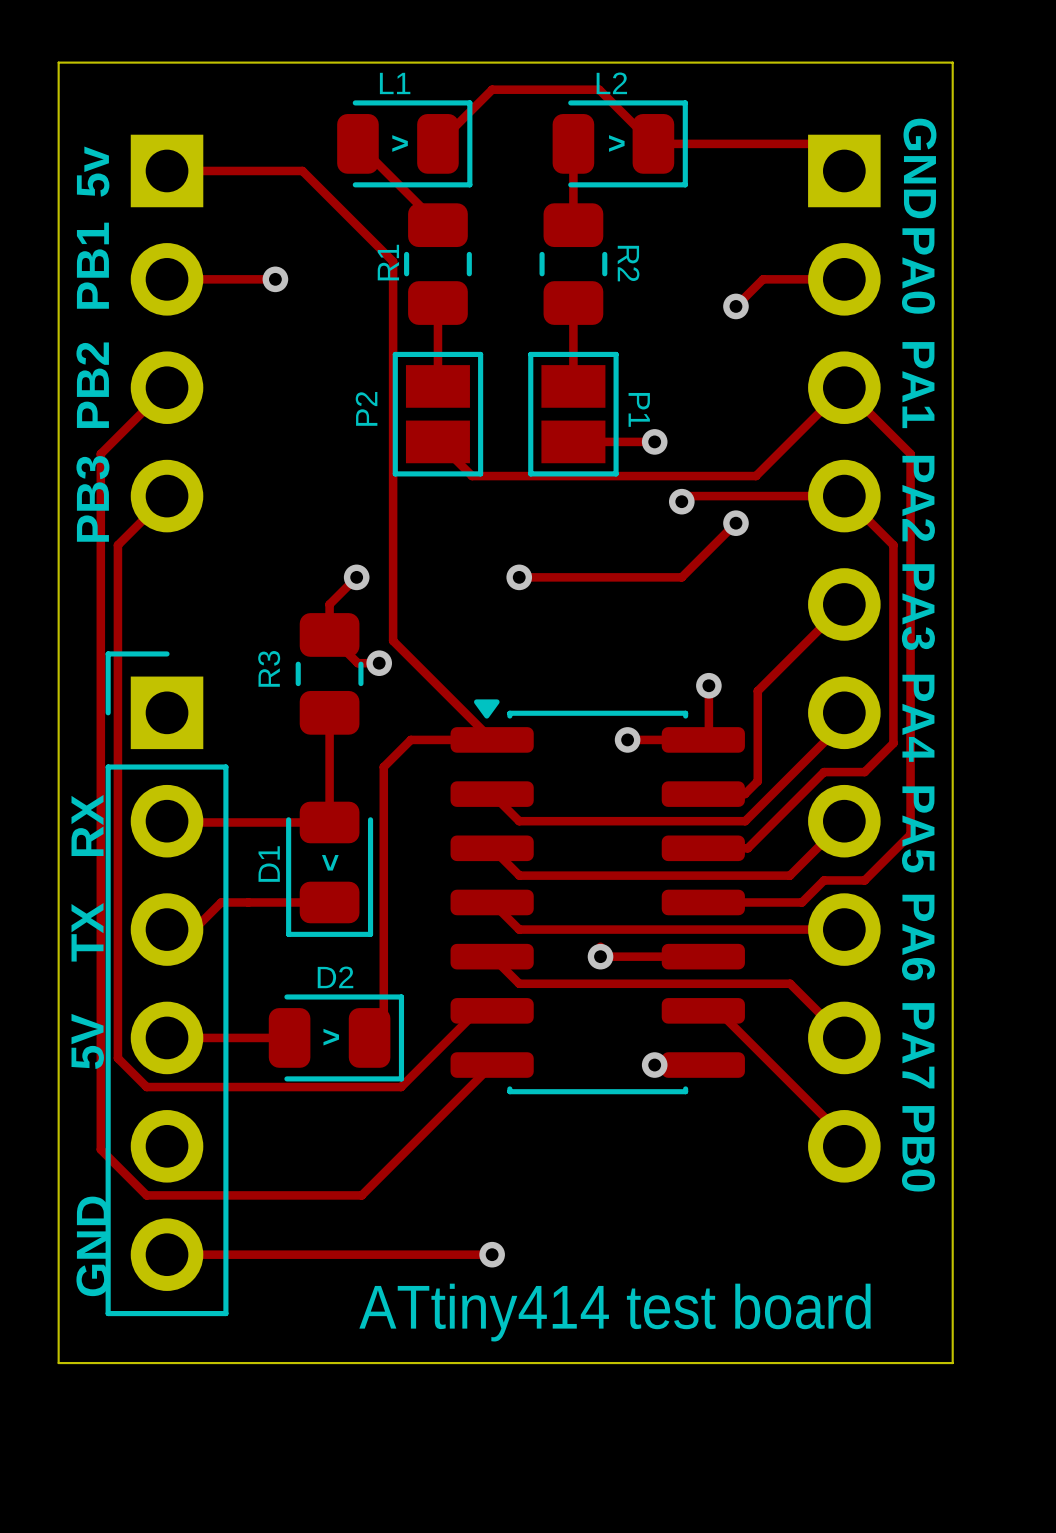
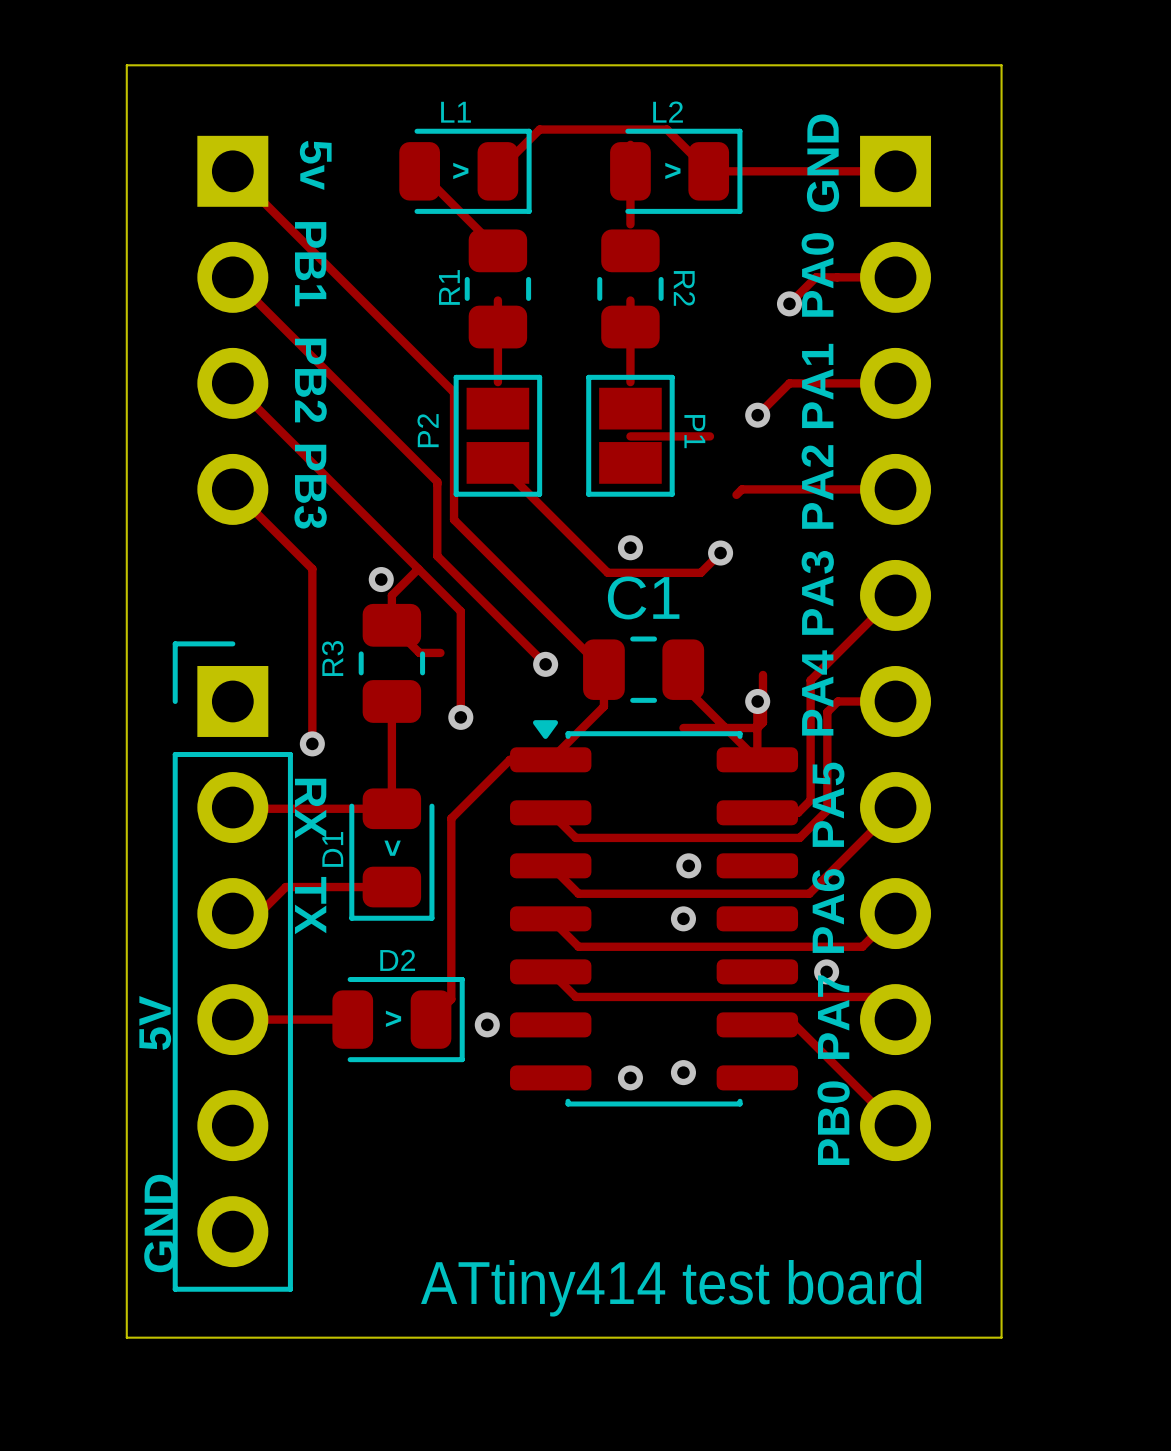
text position: L1 (395, 83) -> L1 (456, 112)
text position: L2 (611, 83) -> L2 (668, 112)
track: (357, 143) (437, 225) -> (419, 171) (497, 250)
text position: > (400, 143) -> > (460, 170)
part position: (404, 143) -> (465, 171)
track: (437, 143) (492, 89) (599, 89) (653, 143) (817, 143) (844, 170) -> (497, 171) (539, 129) (666, 129) (708, 171) (895, 171)
text position: > (616, 143) -> > (672, 170)
part position: (620, 143) -> (676, 171)
text rotation: 0° (919, 168) -> 180° (823, 163)
text position: GND (919, 168) -> GND (823, 163)
track: (167, 170) (302, 170) (393, 261) (393, 397) -> (232, 171) (454, 392)
text rotation: 0° (93, 171) -> 180° (315, 165)
text position: 5v (93, 171) -> 5v (315, 165)
text position: R1 (388, 262) -> R1 (449, 287)
text position: R2 (628, 263) -> R2 (684, 288)
part position: (437, 264) -> (497, 288)
part position: (573, 264) -> (630, 288)
text rotation: 0° (92, 265) -> 180° (310, 264)
text position: PB1 (92, 265) -> PB1 (310, 264)
text rotation: 0° (918, 271) -> 180° (817, 274)
text position: PA0 (918, 271) -> PA0 (817, 274)
track: (167, 279) (275, 279) -> (232, 277) (437, 481) (437, 556) (545, 664)
via: (275, 279) -> none
text rotation: 0° (92, 385) -> 180° (310, 380)
text position: PB2 (92, 385) -> PB2 (310, 380)
text rotation: 0° (918, 385) -> 180° (817, 385)
text position: PA1 (918, 385) -> PA1 (817, 385)
track: (167, 387) (100, 453) (100, 1149) (146, 1195) (361, 1195) (492, 1065) -> (232, 383) (460, 611) (460, 717)
track: none -> (895, 383) (789, 383) (757, 415)
text position: P2 (366, 408) -> P2 (428, 430)
text position: P1 (639, 409) -> P1 (694, 431)
part position: (437, 414) -> (497, 435)
part position: (573, 414) -> (630, 435)
via: none -> (757, 415)
track: (437, 441) (472, 476) (755, 476) (844, 387) (910, 453) (910, 834) (864, 880) (824, 880) (801, 902) (703, 902) -> none
via: (654, 441) -> none
track: none -> (497, 462) (607, 572) (700, 572) (720, 553)
track: (167, 496) (117, 545) (117, 1058) (146, 1087) (401, 1087) (477, 1010) (492, 1010) -> (232, 489) (312, 568) (312, 743)
track: (844, 496) (893, 545) (893, 743) (864, 772) (824, 772) (747, 848) (703, 848) -> none
text rotation: 0° (92, 498) -> 180° (310, 486)
text position: PB3 (92, 498) -> PB3 (310, 486)
text rotation: 0° (918, 498) -> 180° (817, 486)
text position: PA2 (918, 498) -> PA2 (817, 486)
via: (681, 501) -> none
track: (735, 523) (681, 577) (519, 577) -> none
via: (735, 523) -> none
track: (393, 527) (393, 640) (492, 739) (410, 739) (383, 767) (383, 1023) -> (454, 519) (603, 669) (603, 706) (550, 759) (510, 759) (451, 818) (451, 999) (444, 1005)
via: none -> (630, 547)
via: none -> (720, 553)
via position: (356, 577) -> (381, 579)
via: (519, 577) -> none
text rotation: 0° (918, 607) -> 180° (817, 592)
text position: PA3 (918, 607) -> PA3 (817, 592)
via: (379, 663) -> none
via: none -> (545, 664)
C1: none -> (643, 669)
track: none -> (683, 669) (683, 685) (757, 759) (757, 701)
via position: (708, 685) -> (757, 701)
track: (757, 691) (757, 781) (744, 794) (703, 794) -> (810, 680) (810, 800) (798, 812) (757, 812)
track: (844, 712) (844, 722) (745, 821) (519, 821) (492, 794) -> (895, 701) (837, 701) (827, 712) (827, 810) (799, 837) (575, 837) (550, 812)
text rotation: 0° (918, 718) -> 180° (817, 692)
text position: PA4 (918, 718) -> PA4 (817, 692)
via: none -> (460, 717)
via: (627, 739) -> none
via: none -> (312, 743)
text rotation: 0° (87, 825) -> 180° (310, 808)
text position: RX (87, 825) -> RX (310, 808)
text rotation: 0° (918, 829) -> 180° (828, 804)
text position: PA5 (918, 829) -> PA5 (828, 804)
track: (492, 848) (519, 875) (789, 875) -> (550, 865) (578, 893) (809, 893) (842, 860)
via: none -> (688, 865)
part position: (597, 896) -> (654, 913)
track: (492, 902) (519, 929) (844, 929) -> (550, 918) (578, 946) (862, 946) (895, 913)
text rotation: 0° (87, 932) -> 180° (310, 905)
text position: TX (87, 932) -> TX (310, 905)
text rotation: 0° (918, 937) -> 180° (828, 910)
text position: PA6 (918, 937) -> PA6 (828, 910)
track: (600, 946) (600, 956) (703, 956) -> none
track: (492, 956) (519, 983) (790, 983) (821, 1014) -> (550, 971) (575, 996) (872, 996)
via position: (600, 956) -> (683, 918)
via: none -> (826, 971)
track: (703, 1010) (718, 1010) (844, 1137) (844, 1146) -> (757, 1024) (794, 1024) (895, 1125)
via: none -> (487, 1024)
text rotation: 0° (918, 1045) -> 180° (833, 1017)
text position: PA7 (918, 1045) -> PA7 (833, 1017)
via position: (654, 1065) -> (683, 1072)
via: none -> (630, 1077)
text rotation: 0° (918, 1148) -> 180° (833, 1123)
text position: PB0 (918, 1148) -> PB0 (833, 1123)
track: (167, 1254) (492, 1254) -> none
via: (492, 1254) -> none

